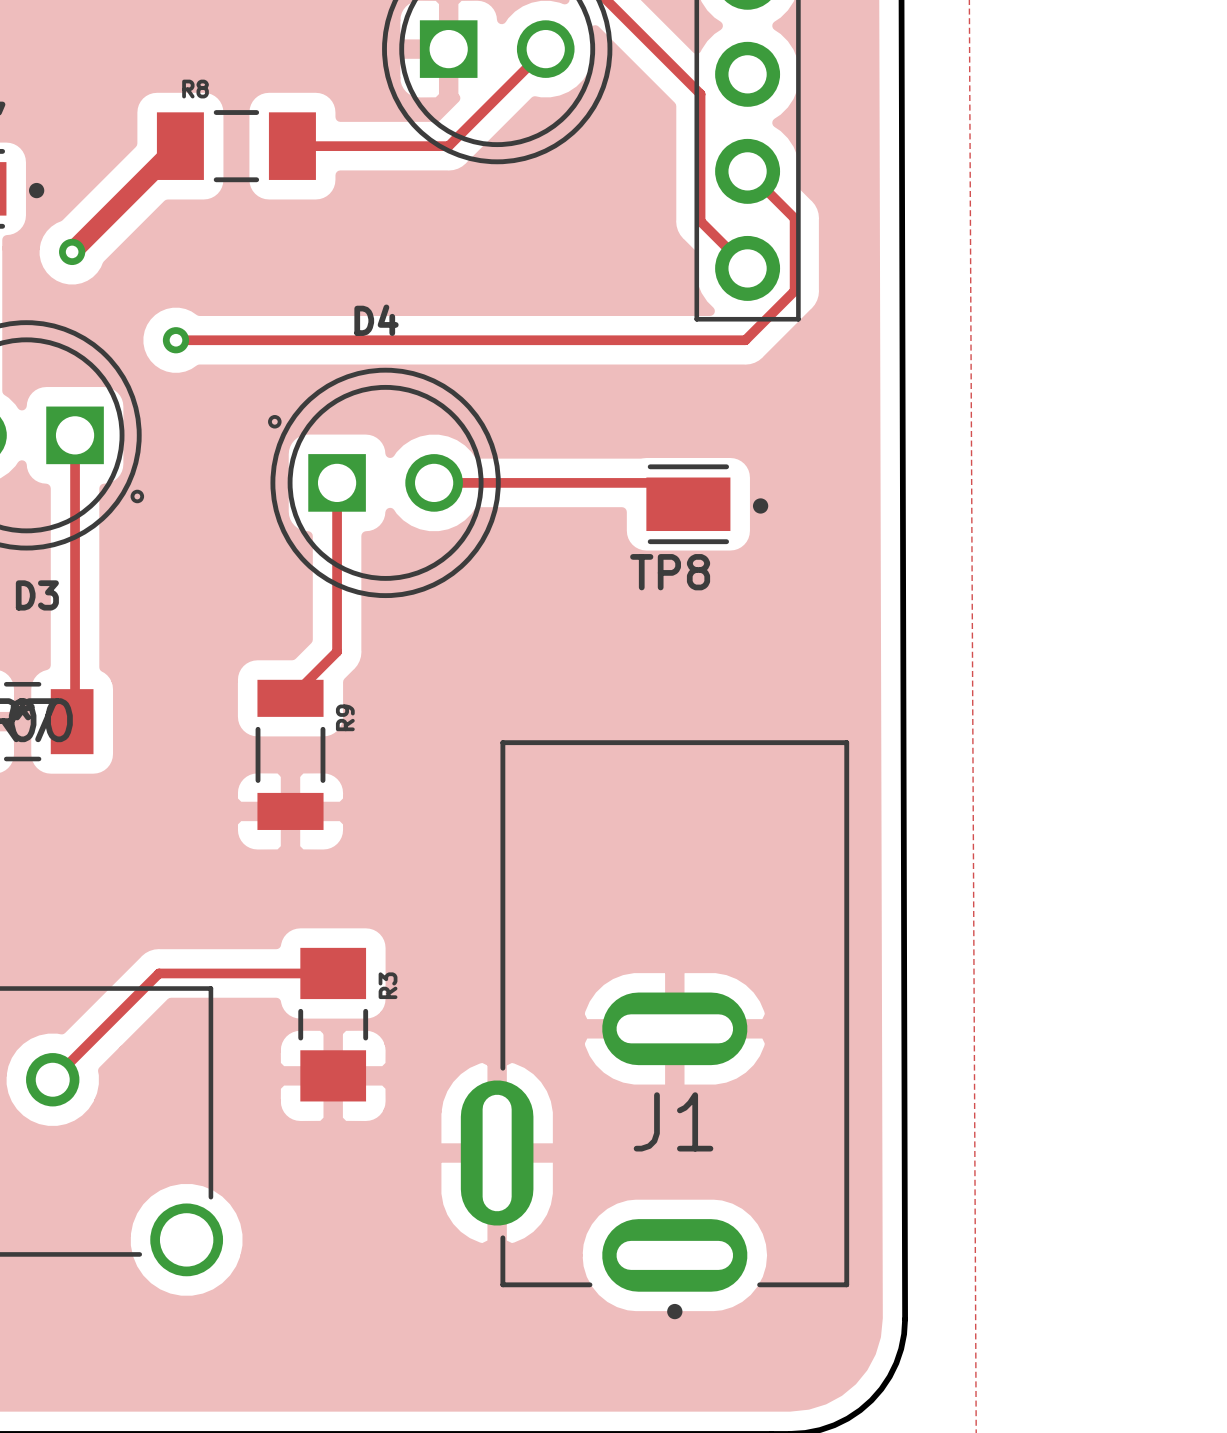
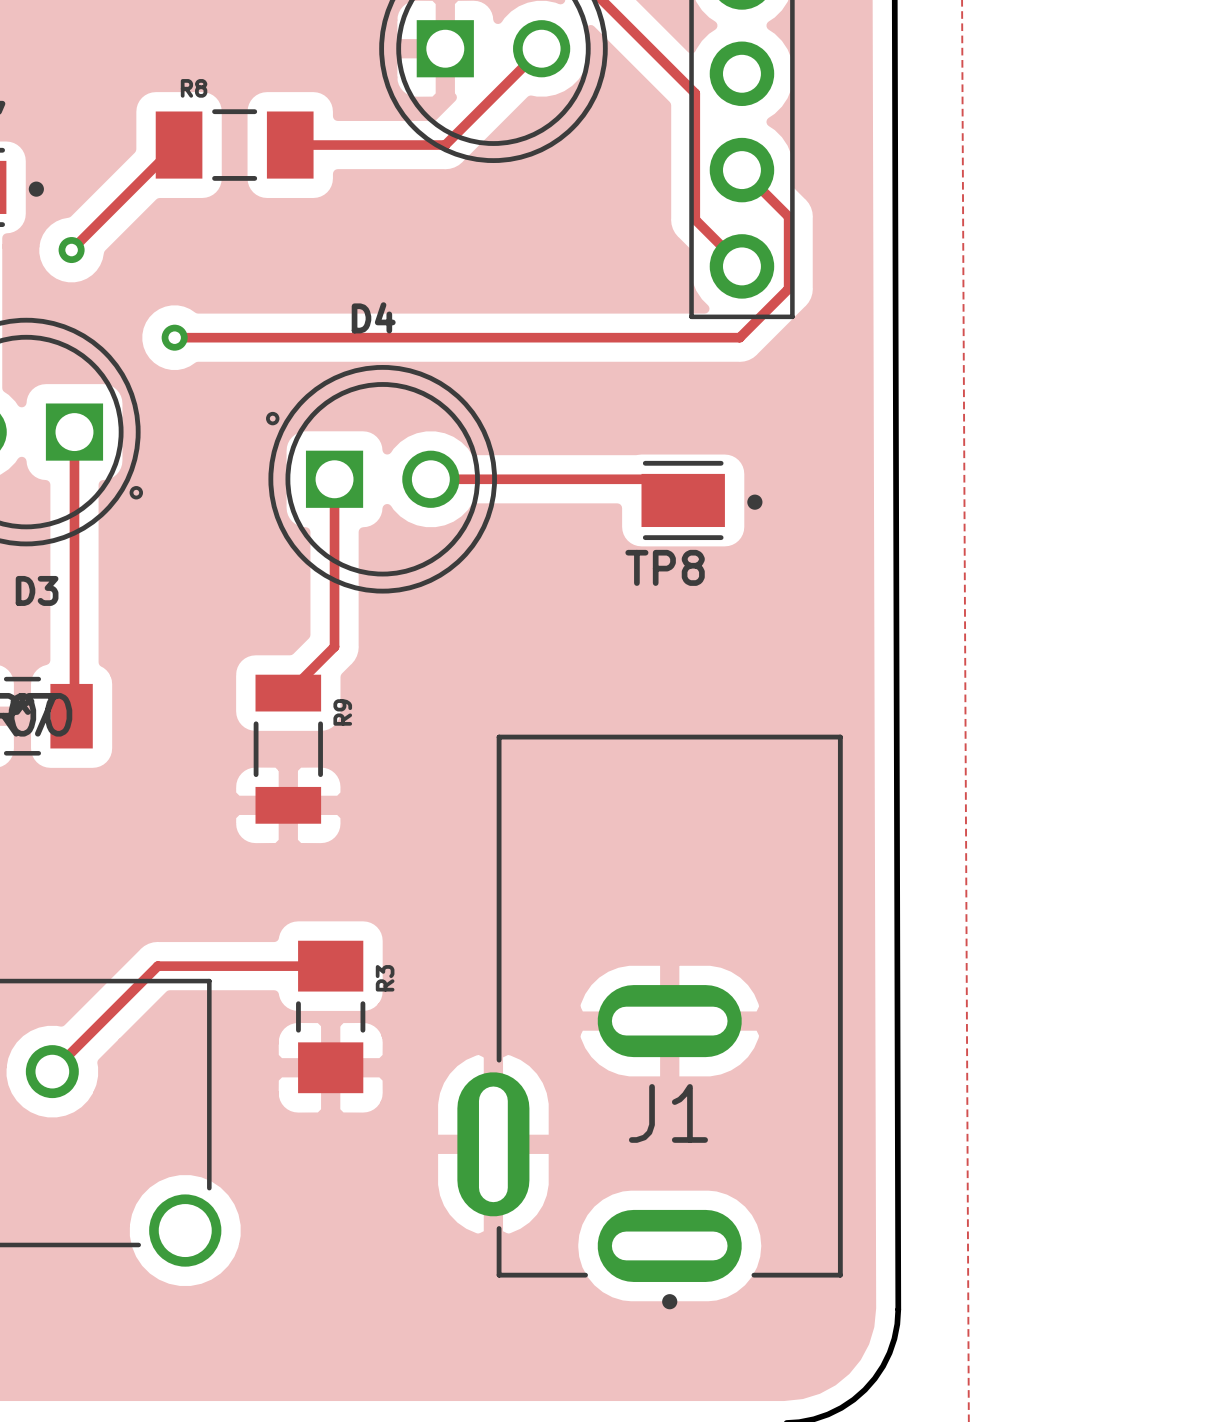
track width: thick (180, 146) (177, 146) (72, 251) -> thin (179, 145) (176, 145) (71, 250)

